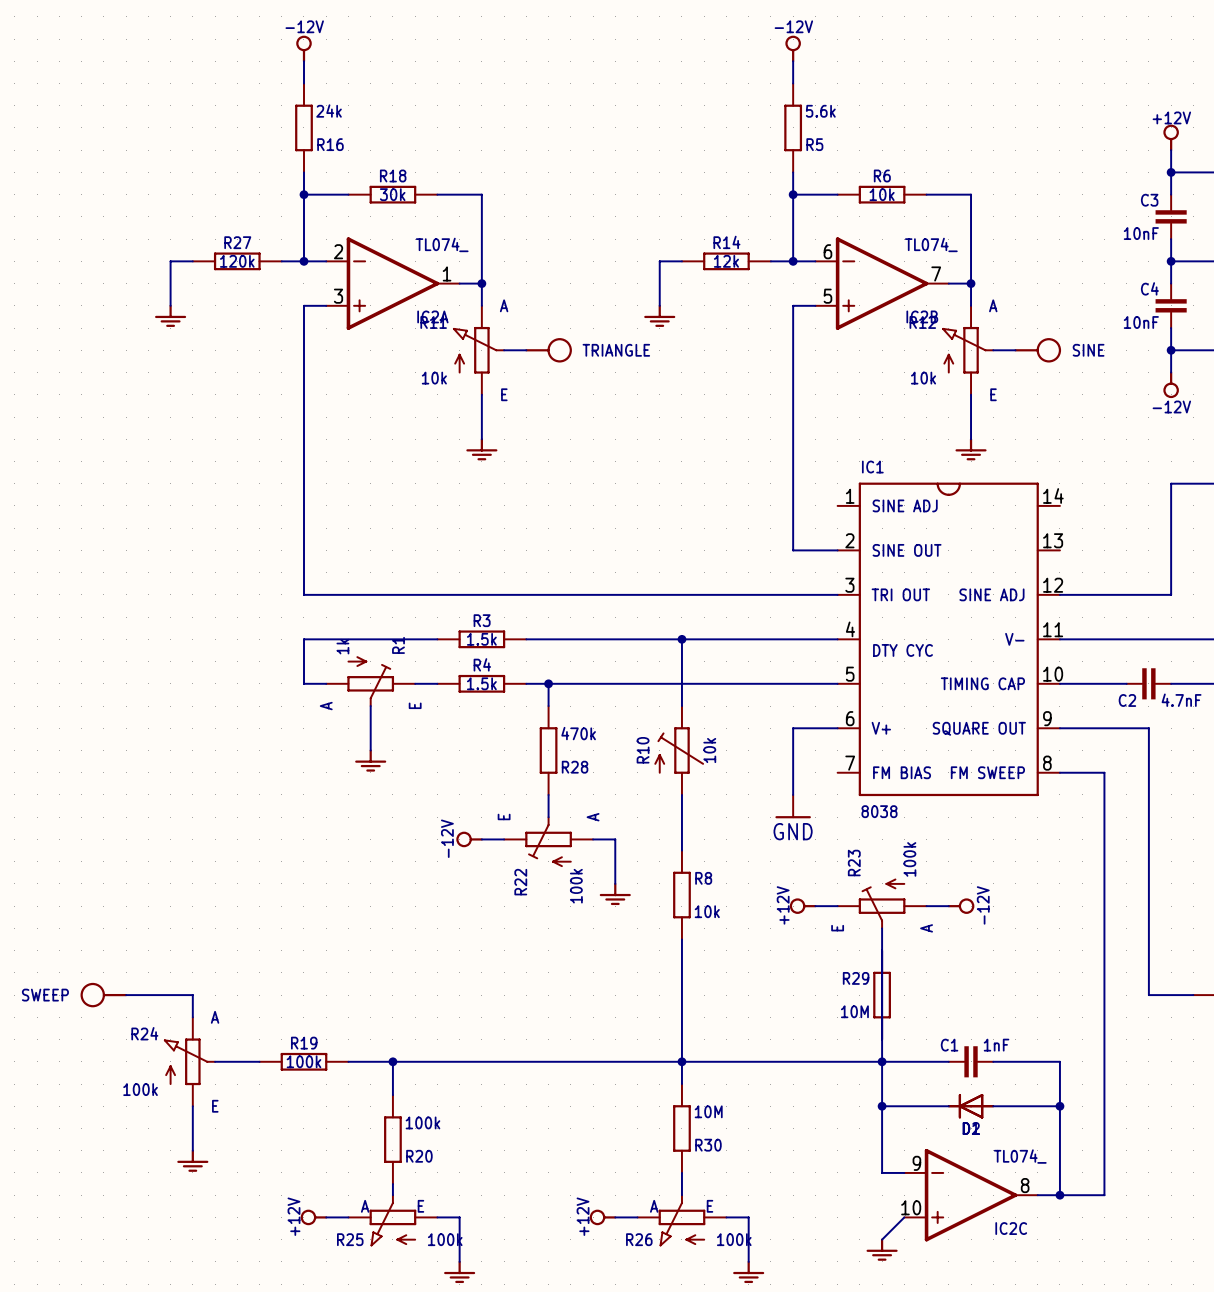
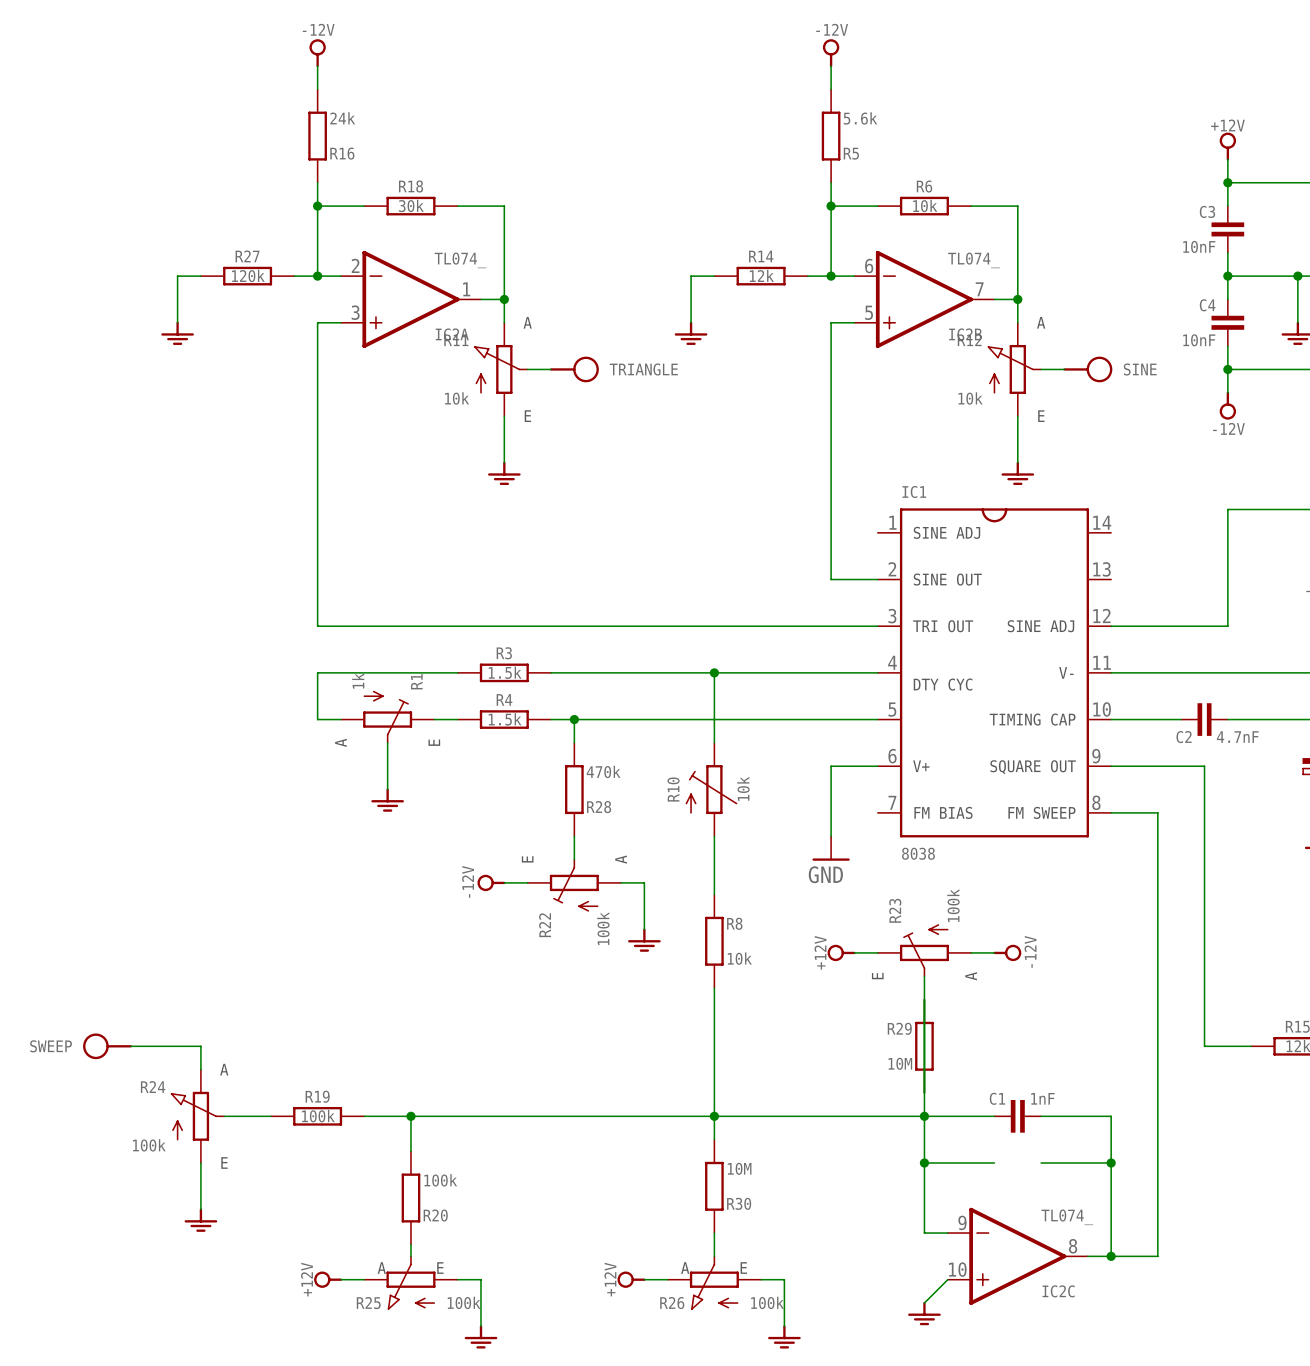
part: (971, 1106) -> none
part: (971, 1106) -> none

